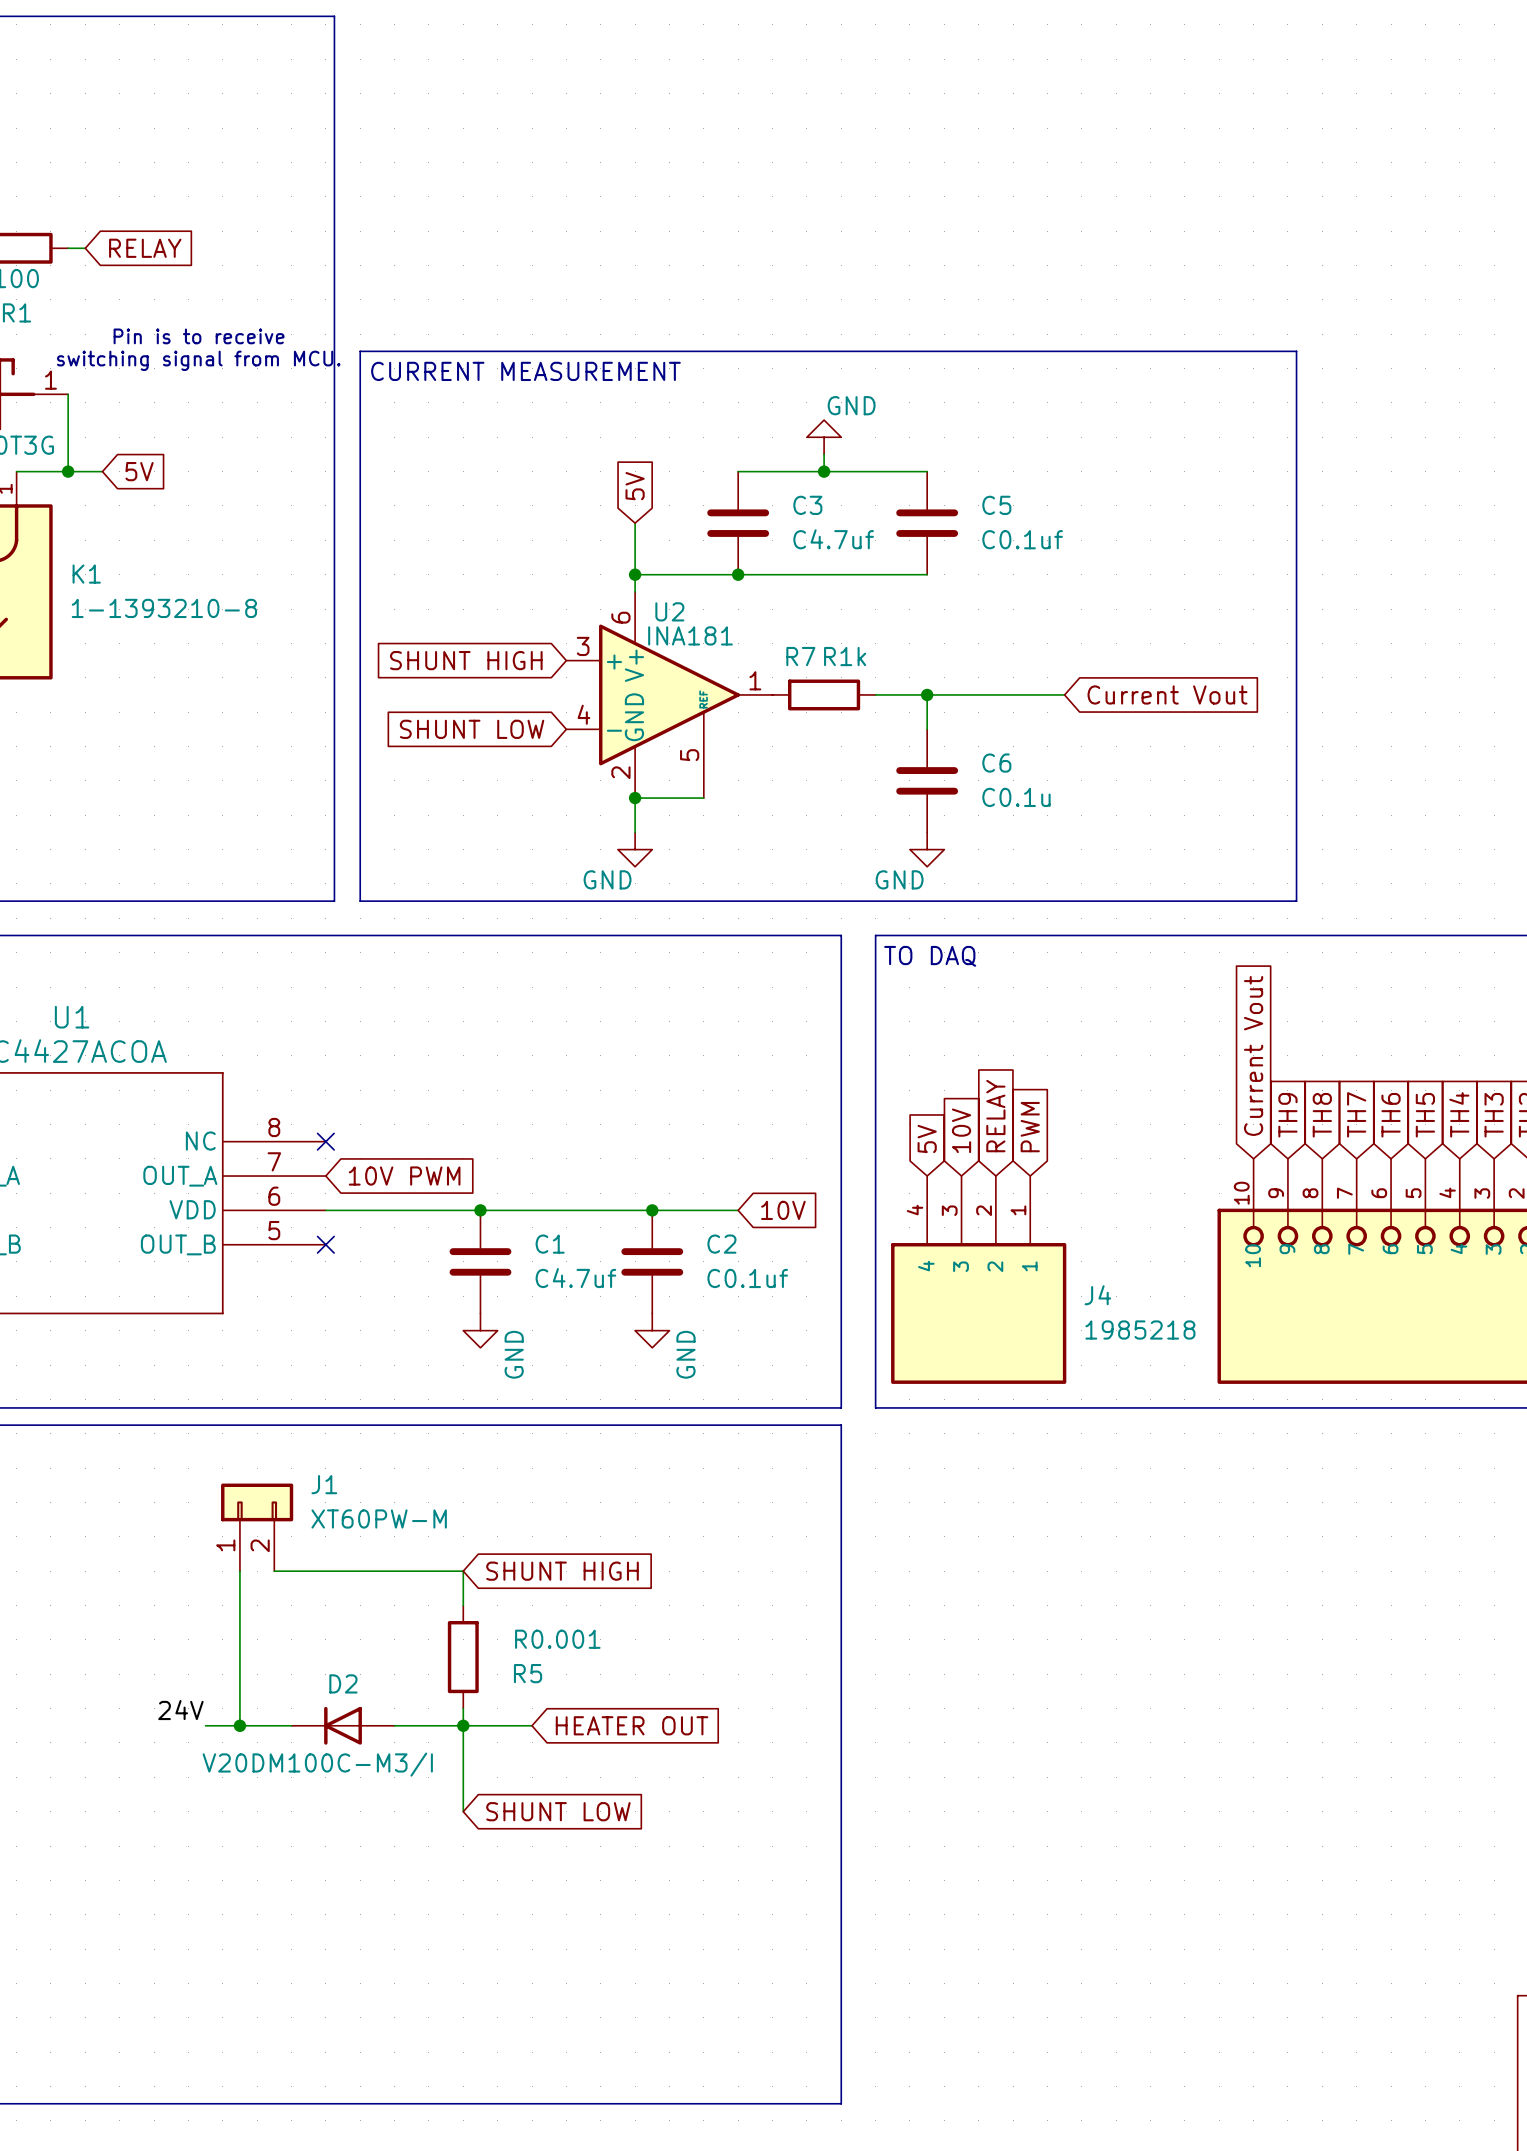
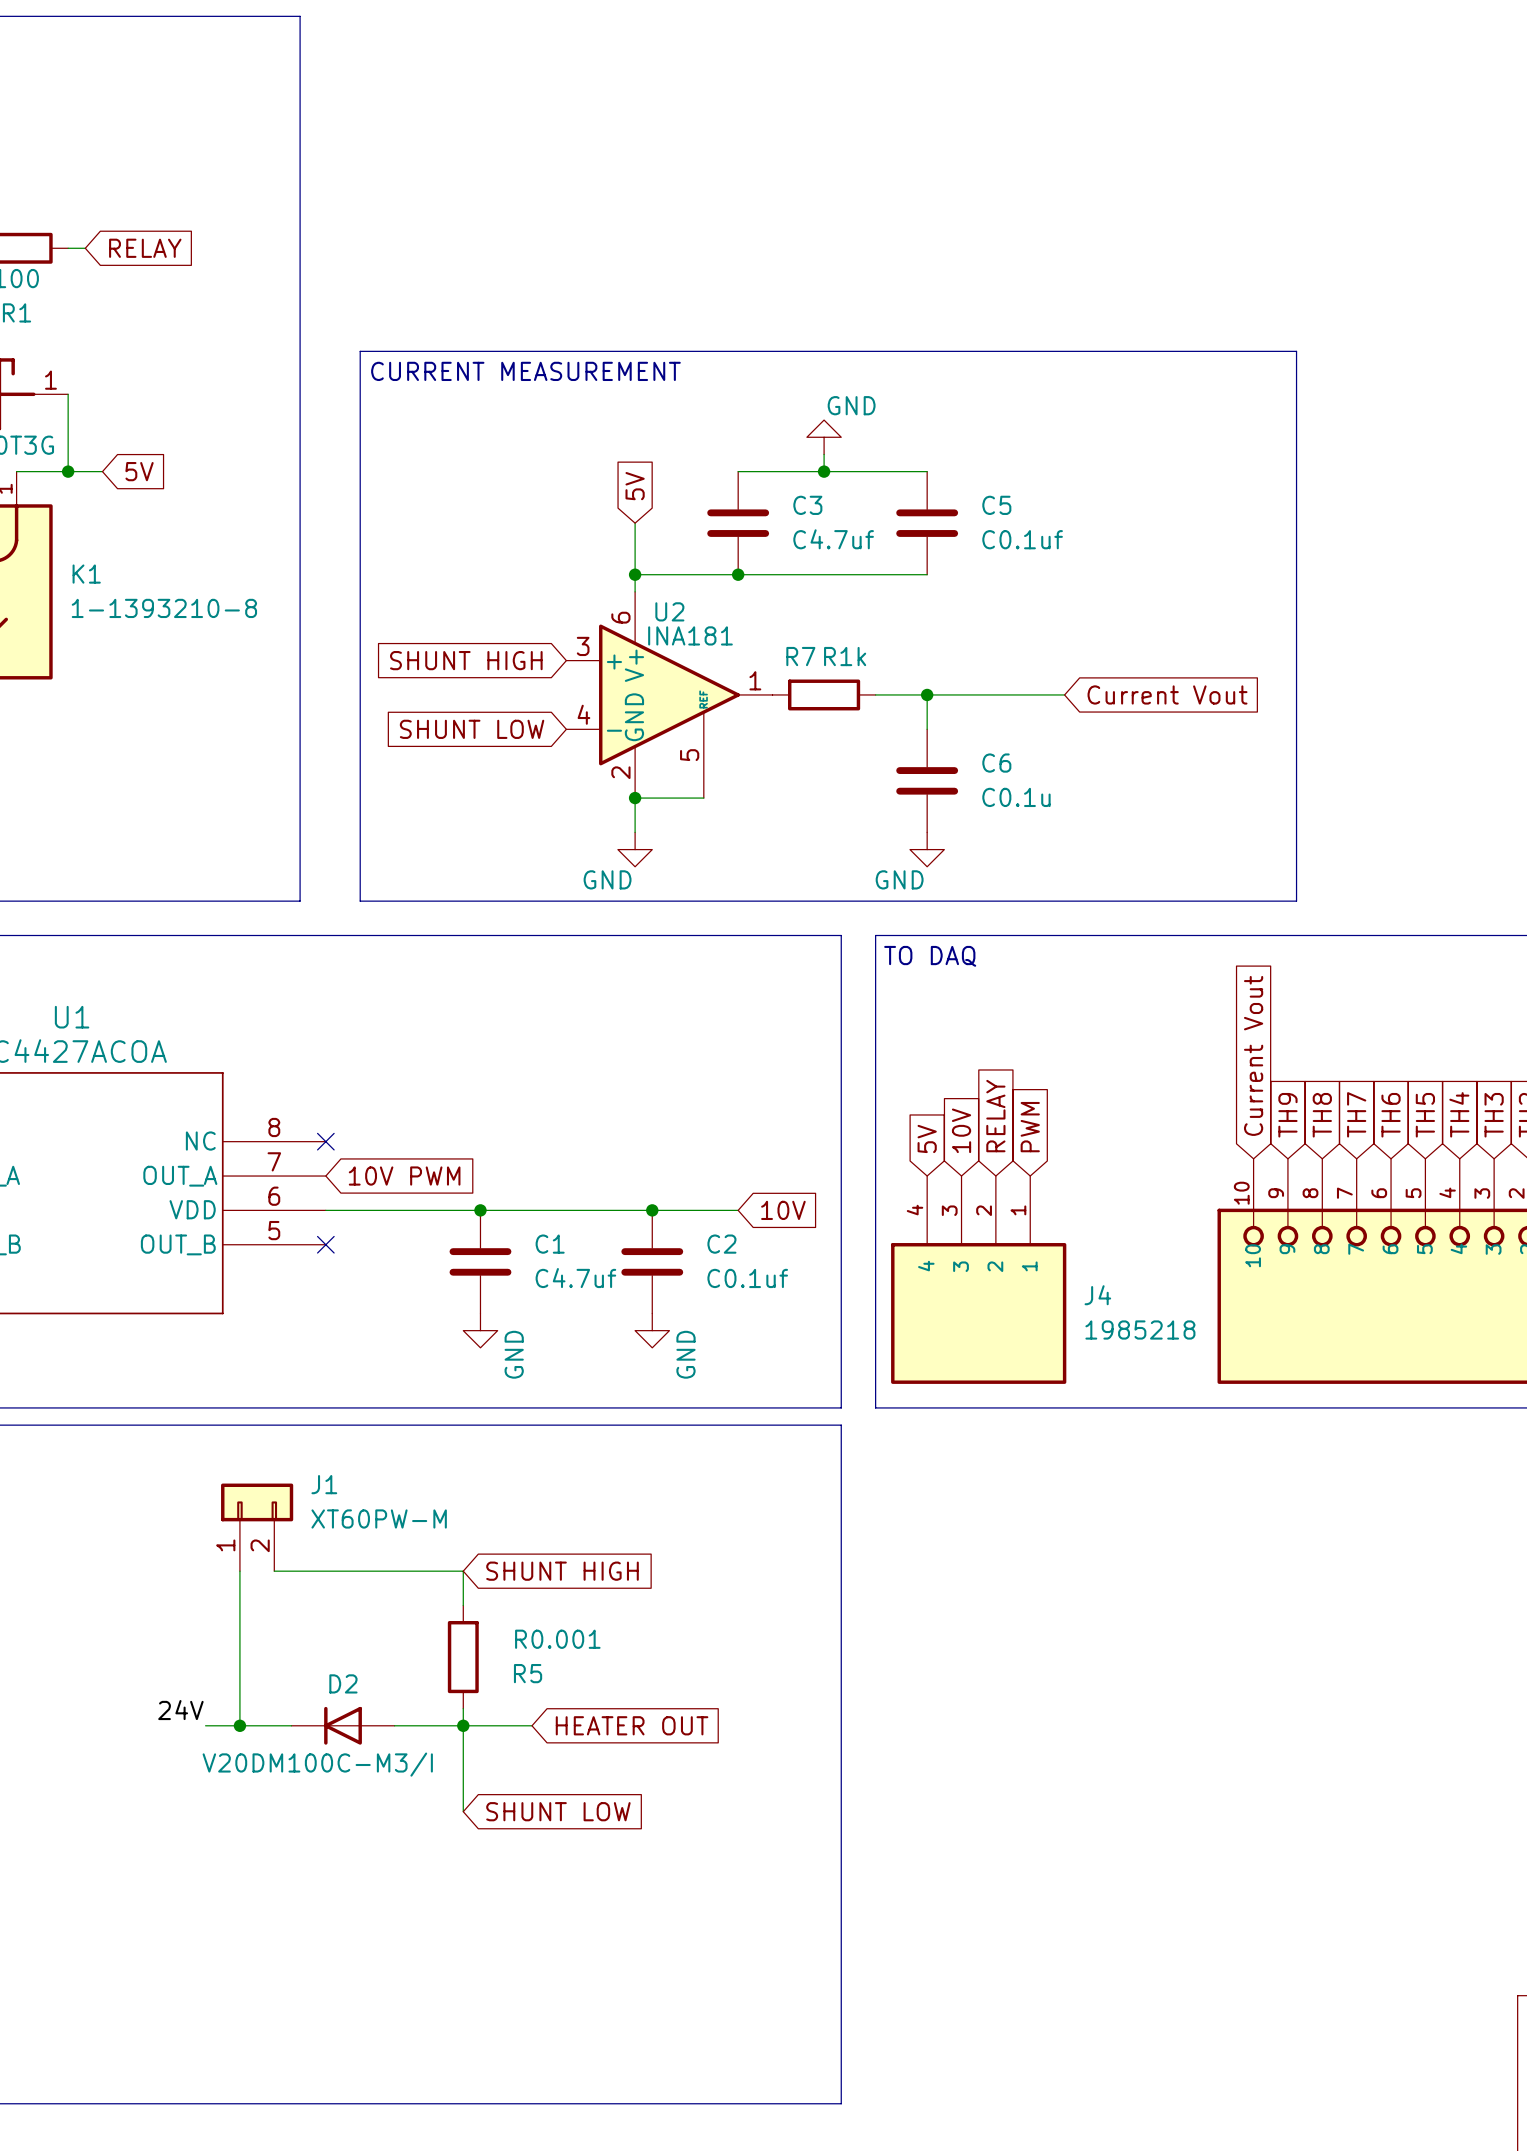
line: (300, 16) (334, 16) (334, 901) (300, 901) -> (300, 16) (300, 901)
text: Pin is to receive (199, 336) -> none
text: switching signal from MCU. (198, 360) -> none

